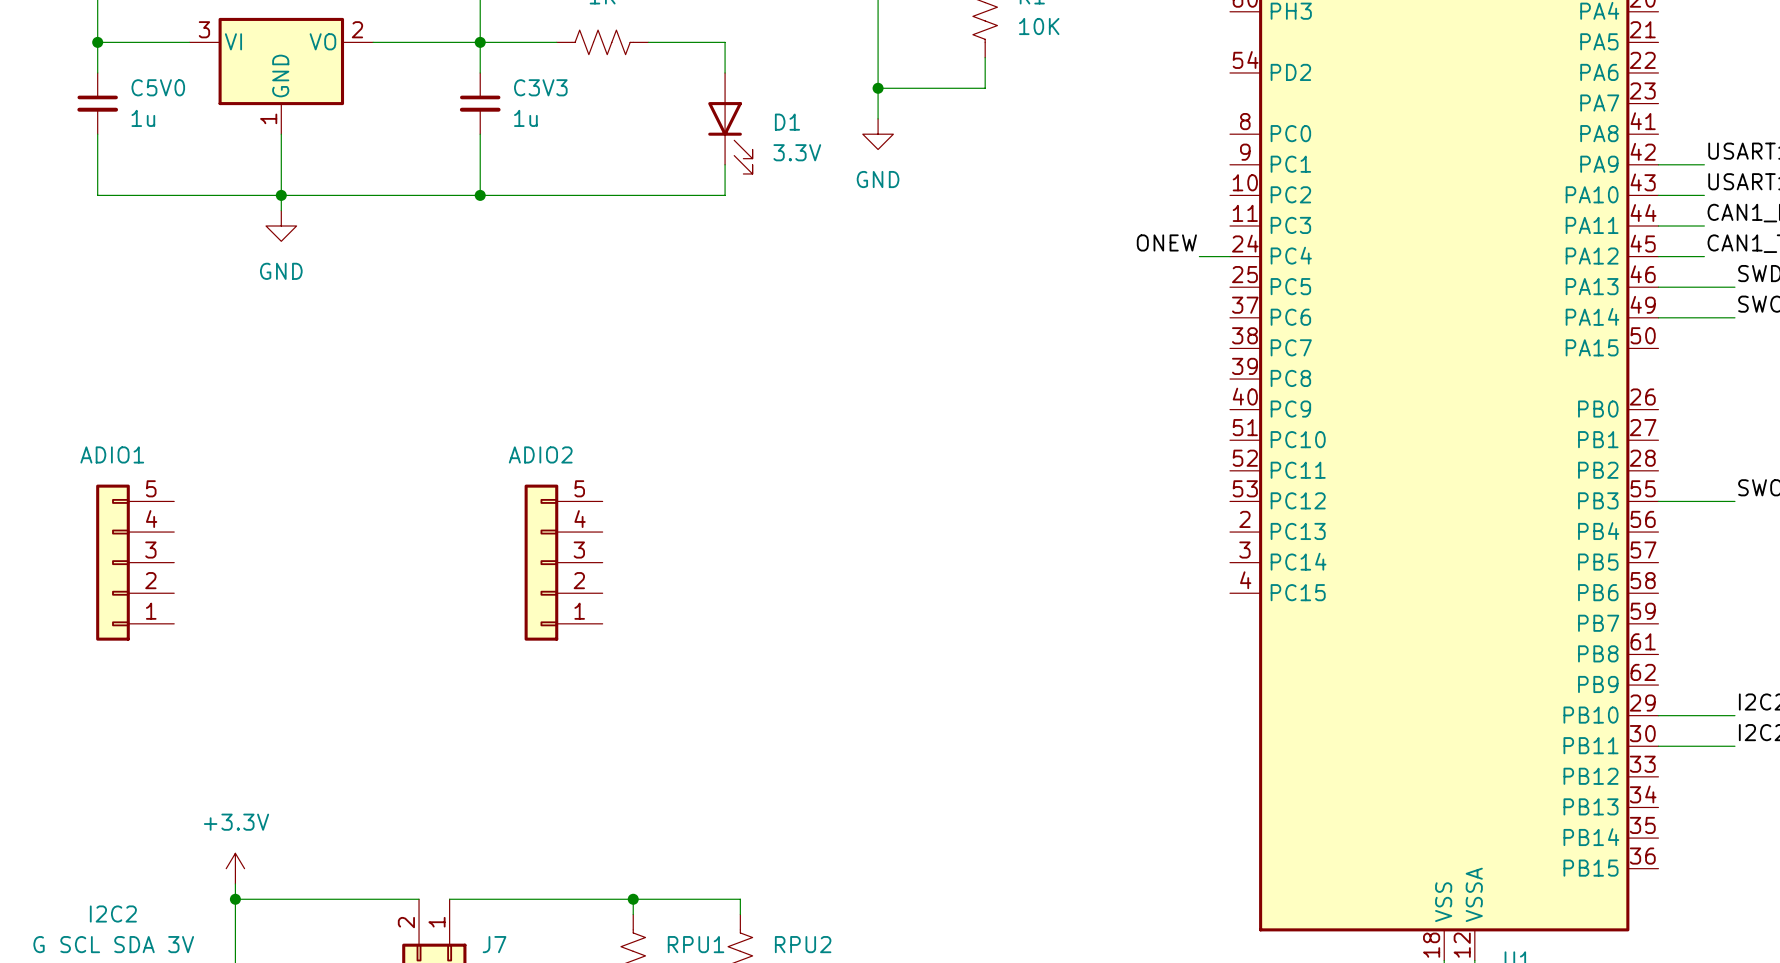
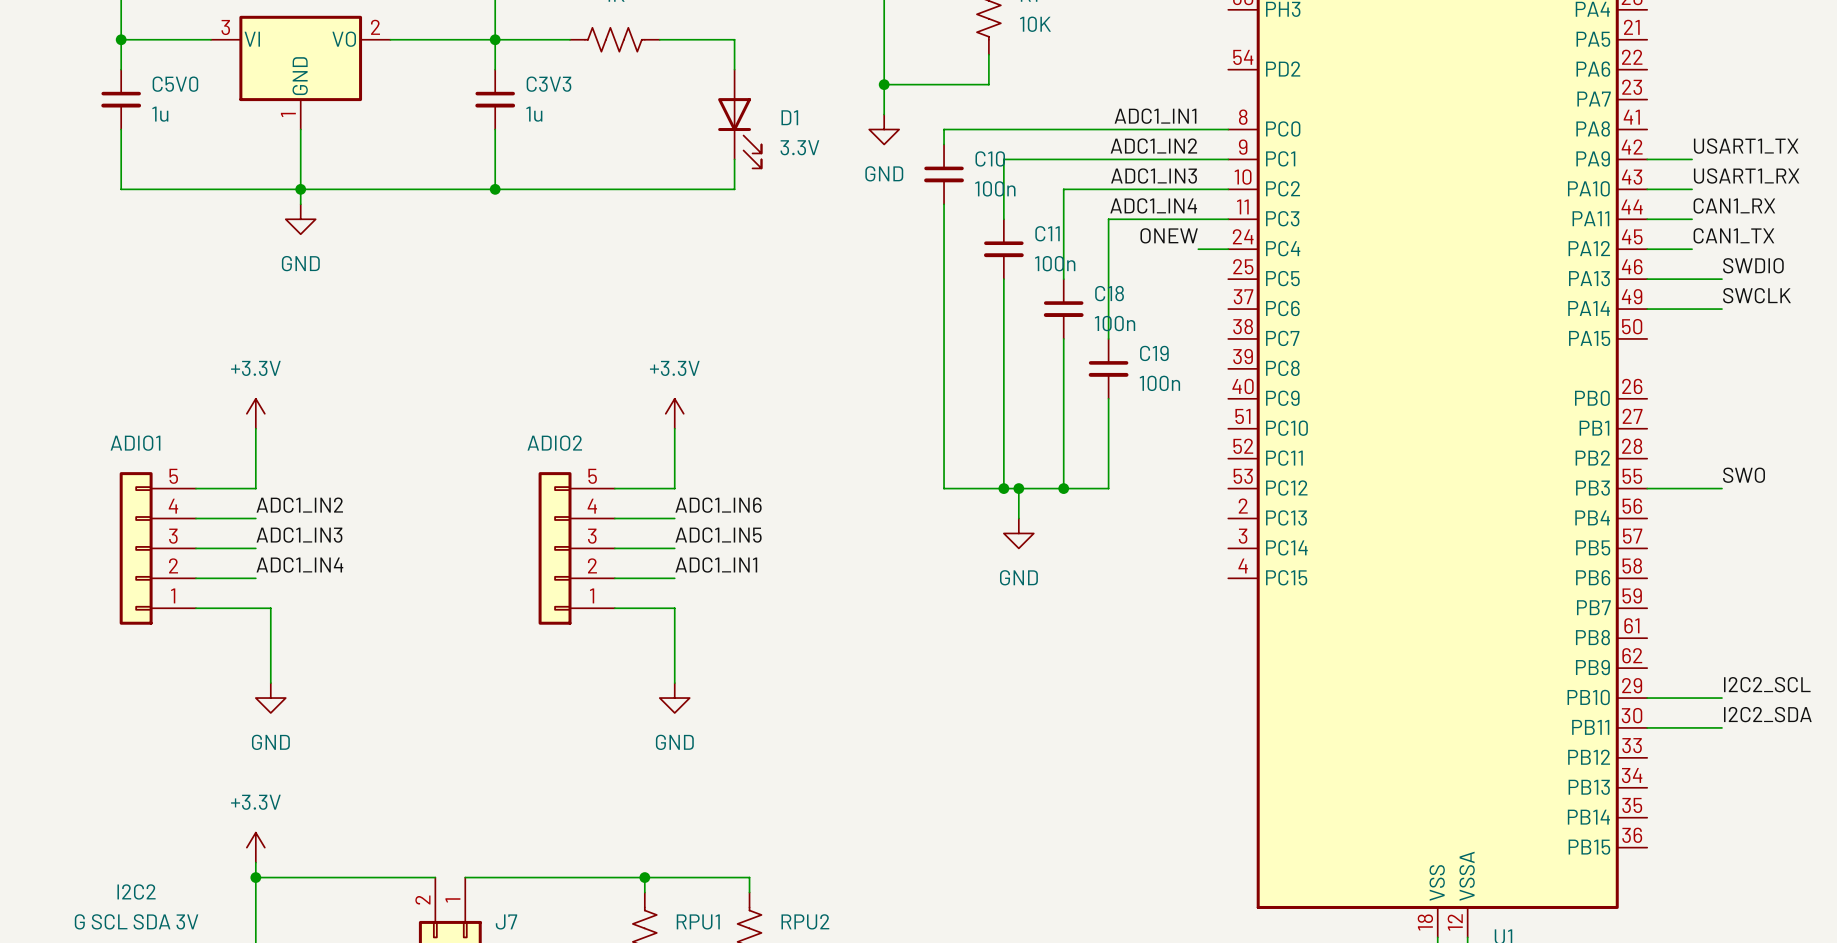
label: none -> ADC1_IN1 (1155, 116)
wire: none -> (1228, 129) (944, 129) (944, 144)
label: none -> ADC1_IN2 (1153, 146)
wire: none -> (1228, 159) (1003, 159) (1003, 219)
C10: none -> 100n (944, 174)
label: none -> ADC1_IN3 (1154, 176)
wire: none -> (1228, 189) (1063, 189) (1063, 279)
wire: none -> (944, 204) (944, 488) (1108, 488) (1108, 398)
label: none -> ADC1_IN4 (1153, 205)
wire: none -> (1228, 219) (1108, 219) (1108, 338)
C11: none -> 100n (1003, 249)
wire: none -> (1003, 279) (1003, 488)
C18: none -> 100n (1063, 309)
wire: none -> (1063, 338) (1063, 488)
C19: none -> 100n (1108, 368)
power symbol: none -> +3.3V (255, 413)
power symbol: none -> +3.3V (674, 413)
wire: none -> (255, 428) (255, 488) (195, 488)
wire: none -> (674, 428) (674, 488) (614, 488)
junction: none -> (1003, 488)
wire: none -> (1018, 488) (1018, 518)
junction: none -> (1018, 488)
junction: none -> (1063, 488)
label: none -> ADC1_IN2 (299, 505)
label: none -> ADC1_IN6 (718, 505)
wire: none -> (195, 518) (255, 518)
wire: none -> (614, 518) (674, 518)
power symbol: none -> GND (1018, 533)
label: none -> ADC1_IN3 (299, 535)
label: none -> ADC1_IN5 (718, 535)
wire: none -> (195, 548) (255, 548)
wire: none -> (614, 548) (674, 548)
label: none -> ADC1_IN4 (299, 565)
label: none -> ADC1_IN1 (716, 565)
wire: none -> (195, 578) (255, 578)
wire: none -> (614, 578) (674, 578)
wire: none -> (195, 608) (270, 608) (270, 683)
wire: none -> (614, 608) (674, 608) (674, 683)
power symbol: none -> GND (270, 698)
power symbol: none -> GND (674, 698)

